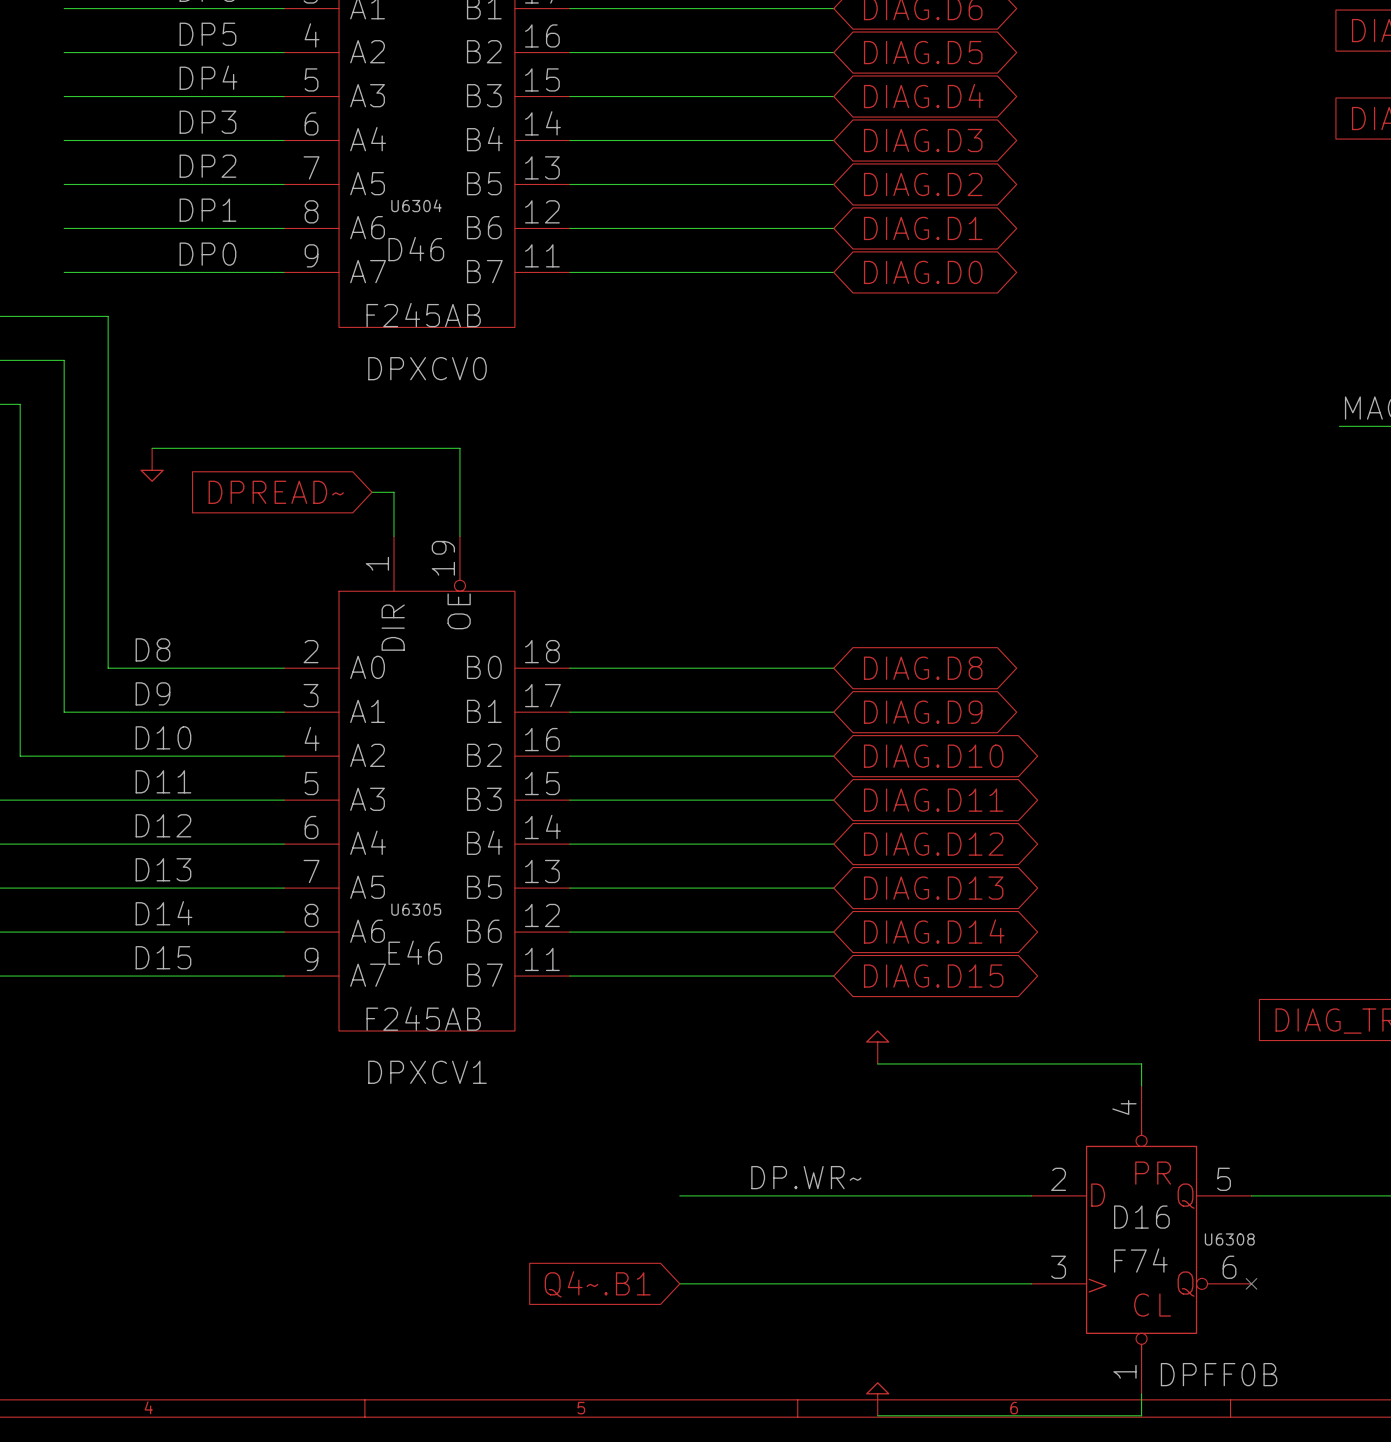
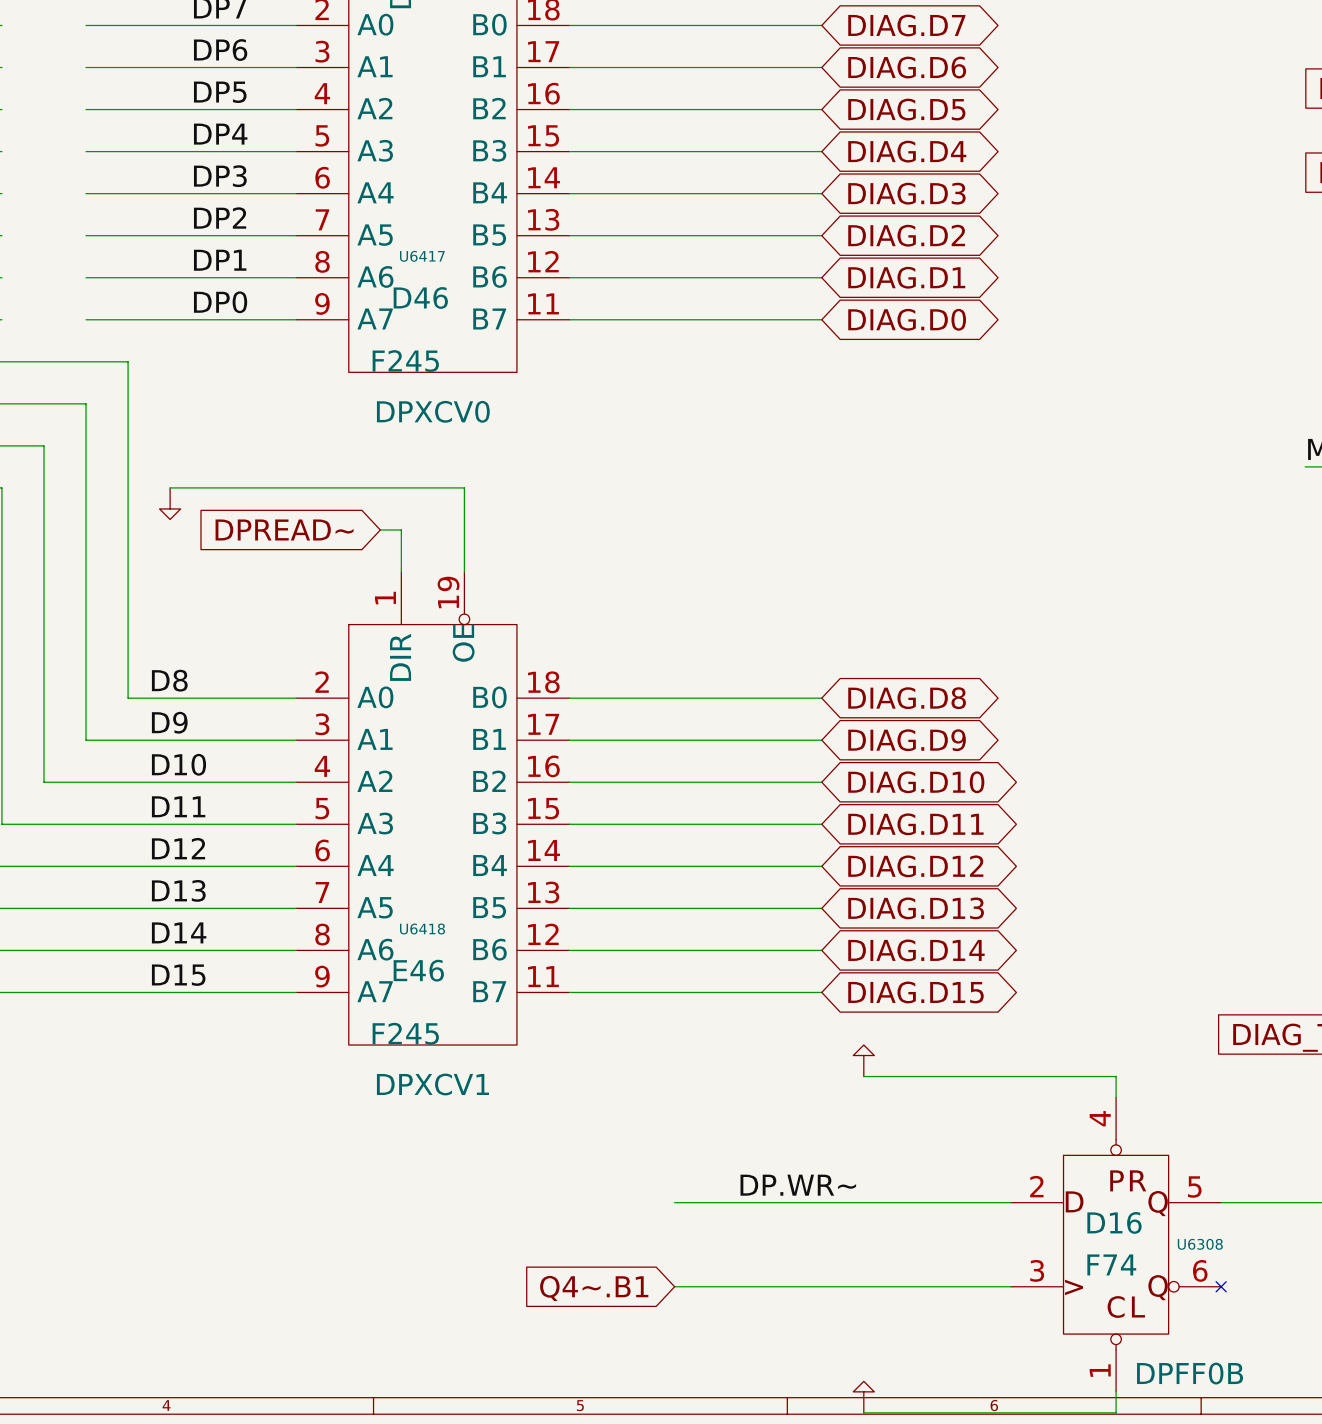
U6304 name: U6304 (416, 205) -> U6417 (422, 256)
U6304 value: F245AB (423, 315) -> F245 (405, 361)
U6305 name: U6305 (416, 909) -> U6418 (422, 929)
U6305 value: F245AB (423, 1018) -> F245 (405, 1033)

